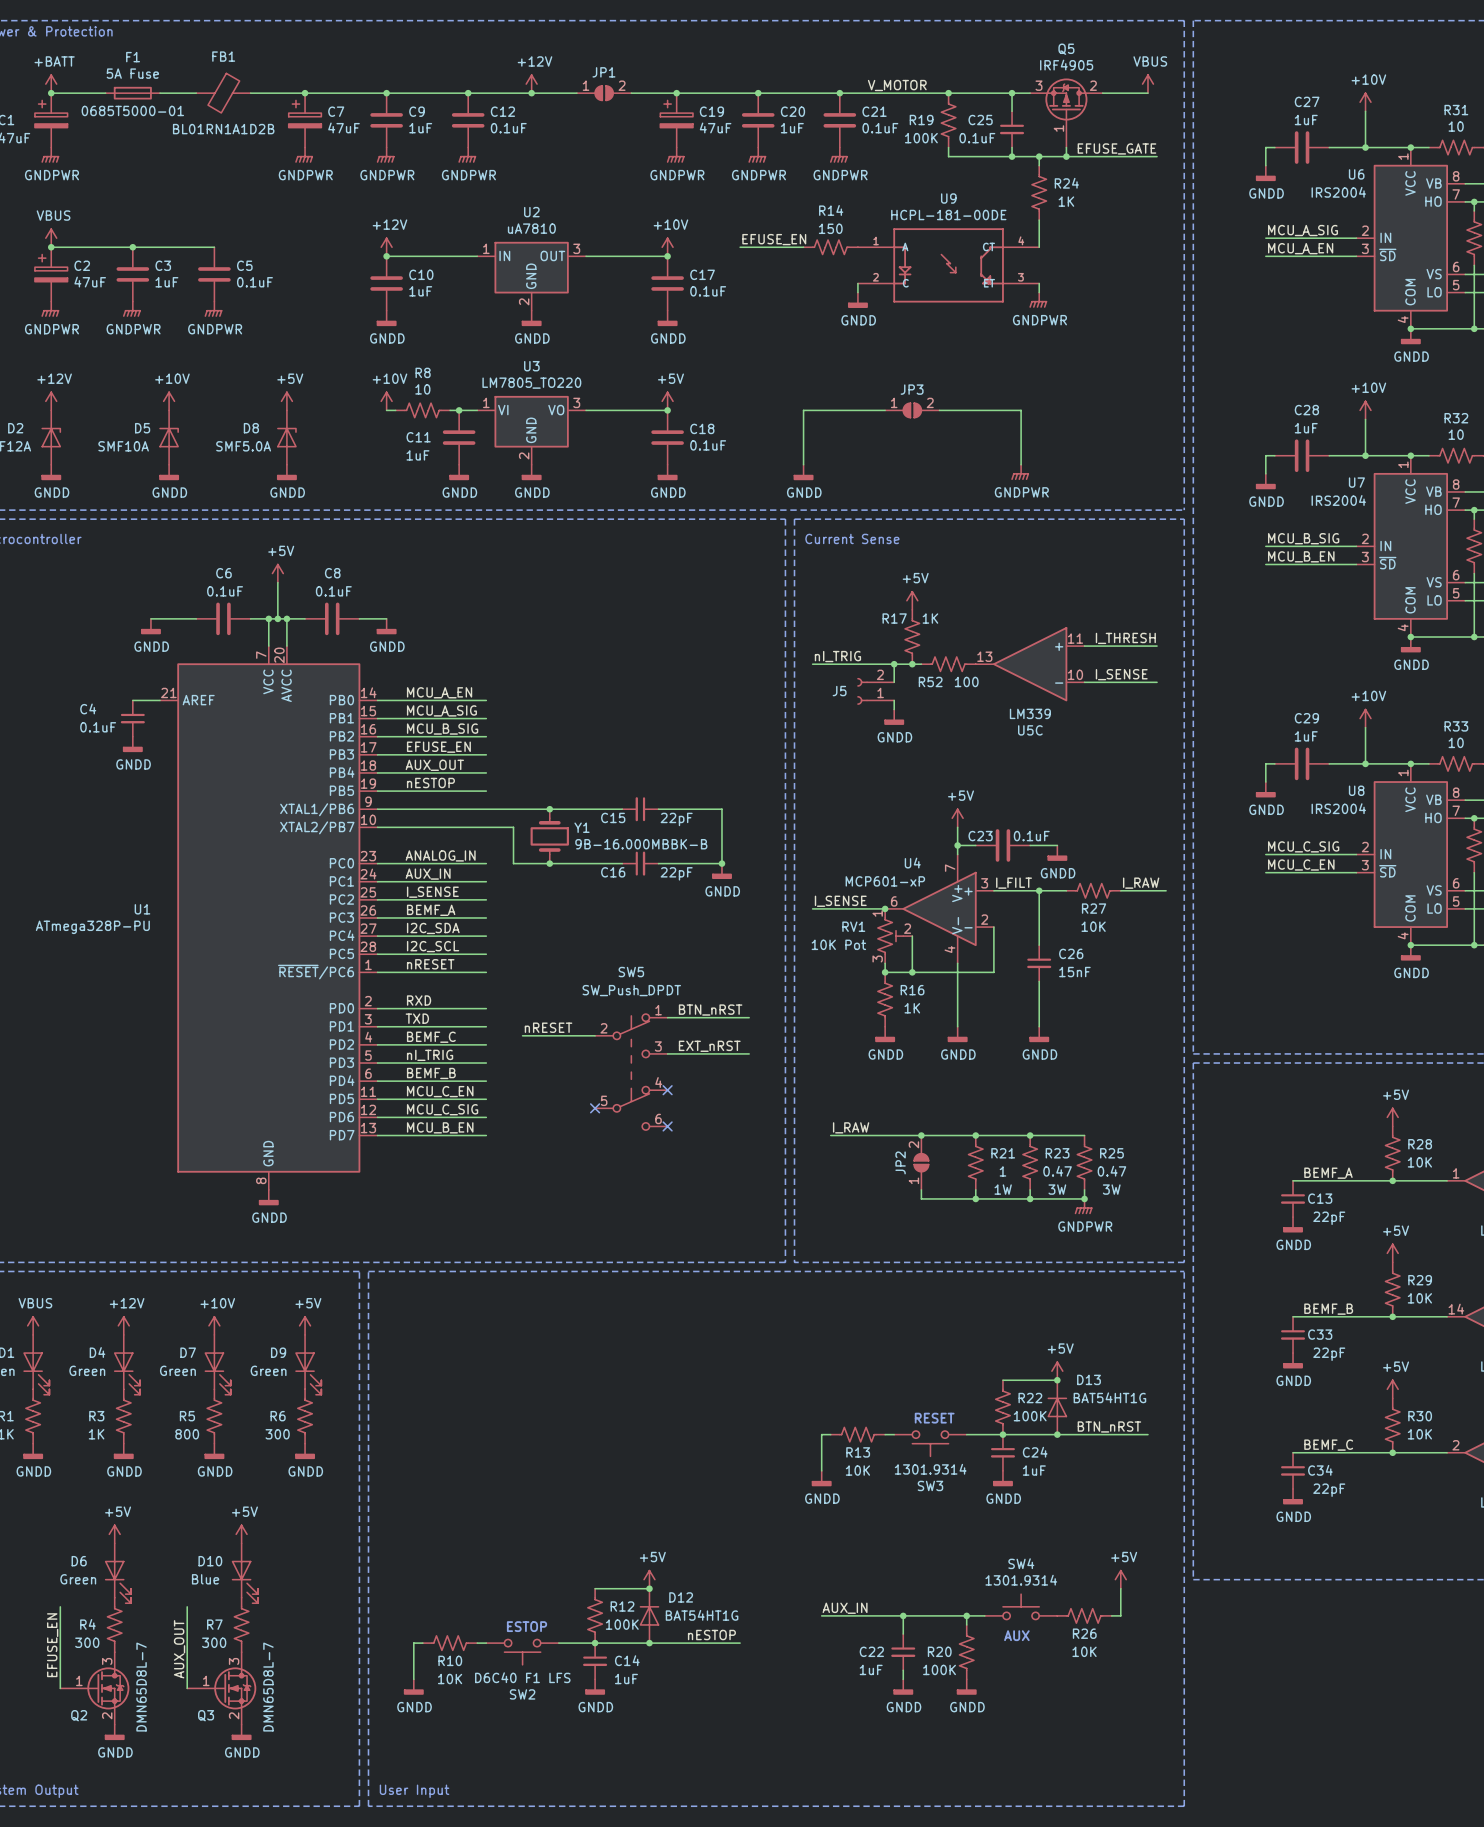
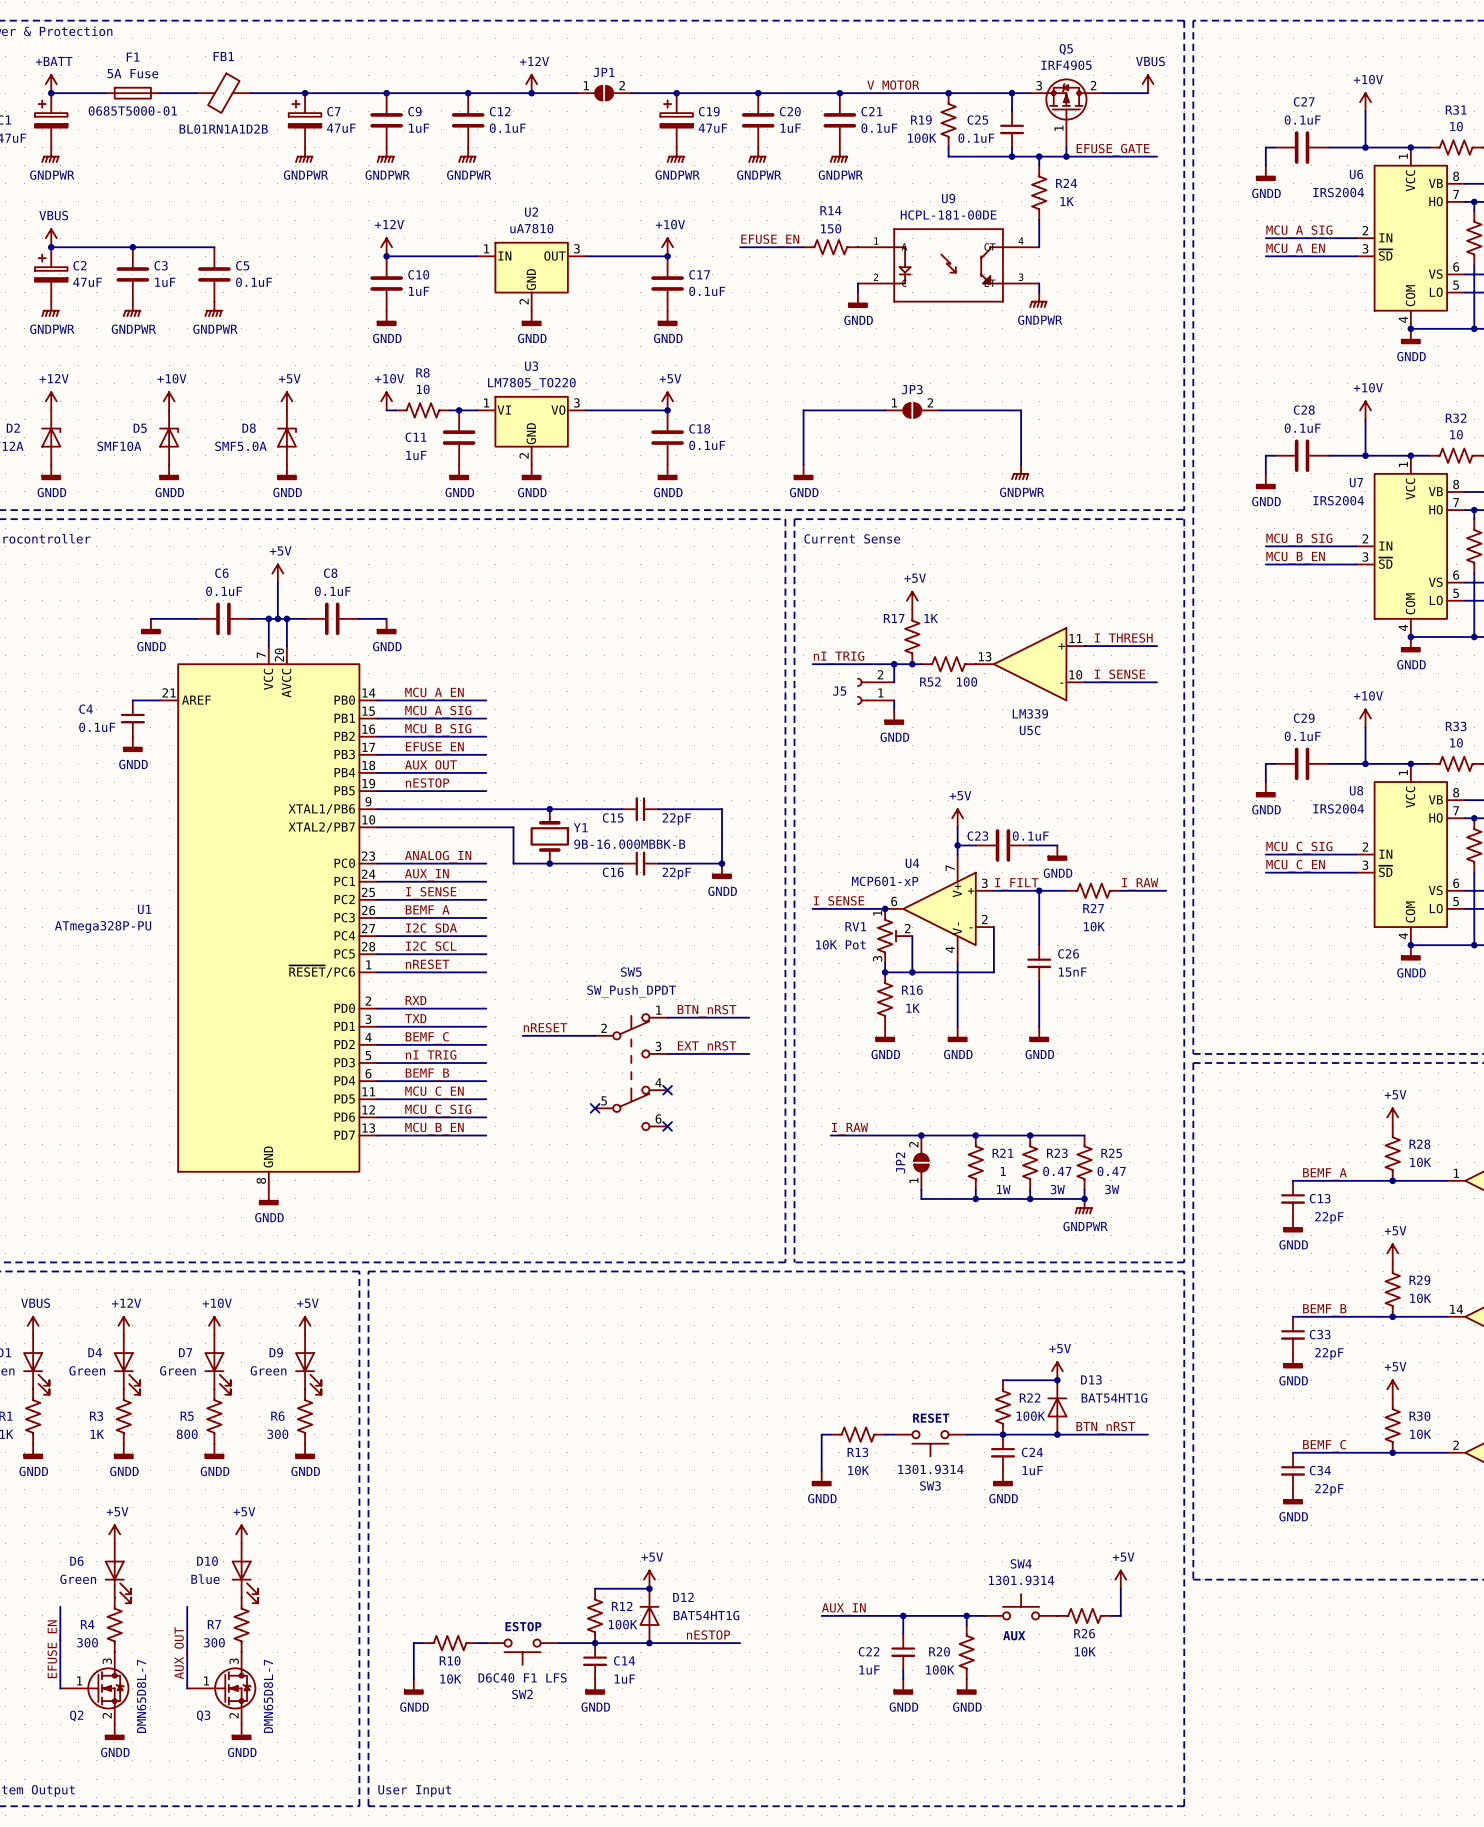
C27 value: 1uF (1306, 120) -> 0.1uF (1302, 120)
C28 value: 1uF (1306, 428) -> 0.1uF (1302, 428)
C29 value: 1uF (1306, 736) -> 0.1uF (1302, 736)

